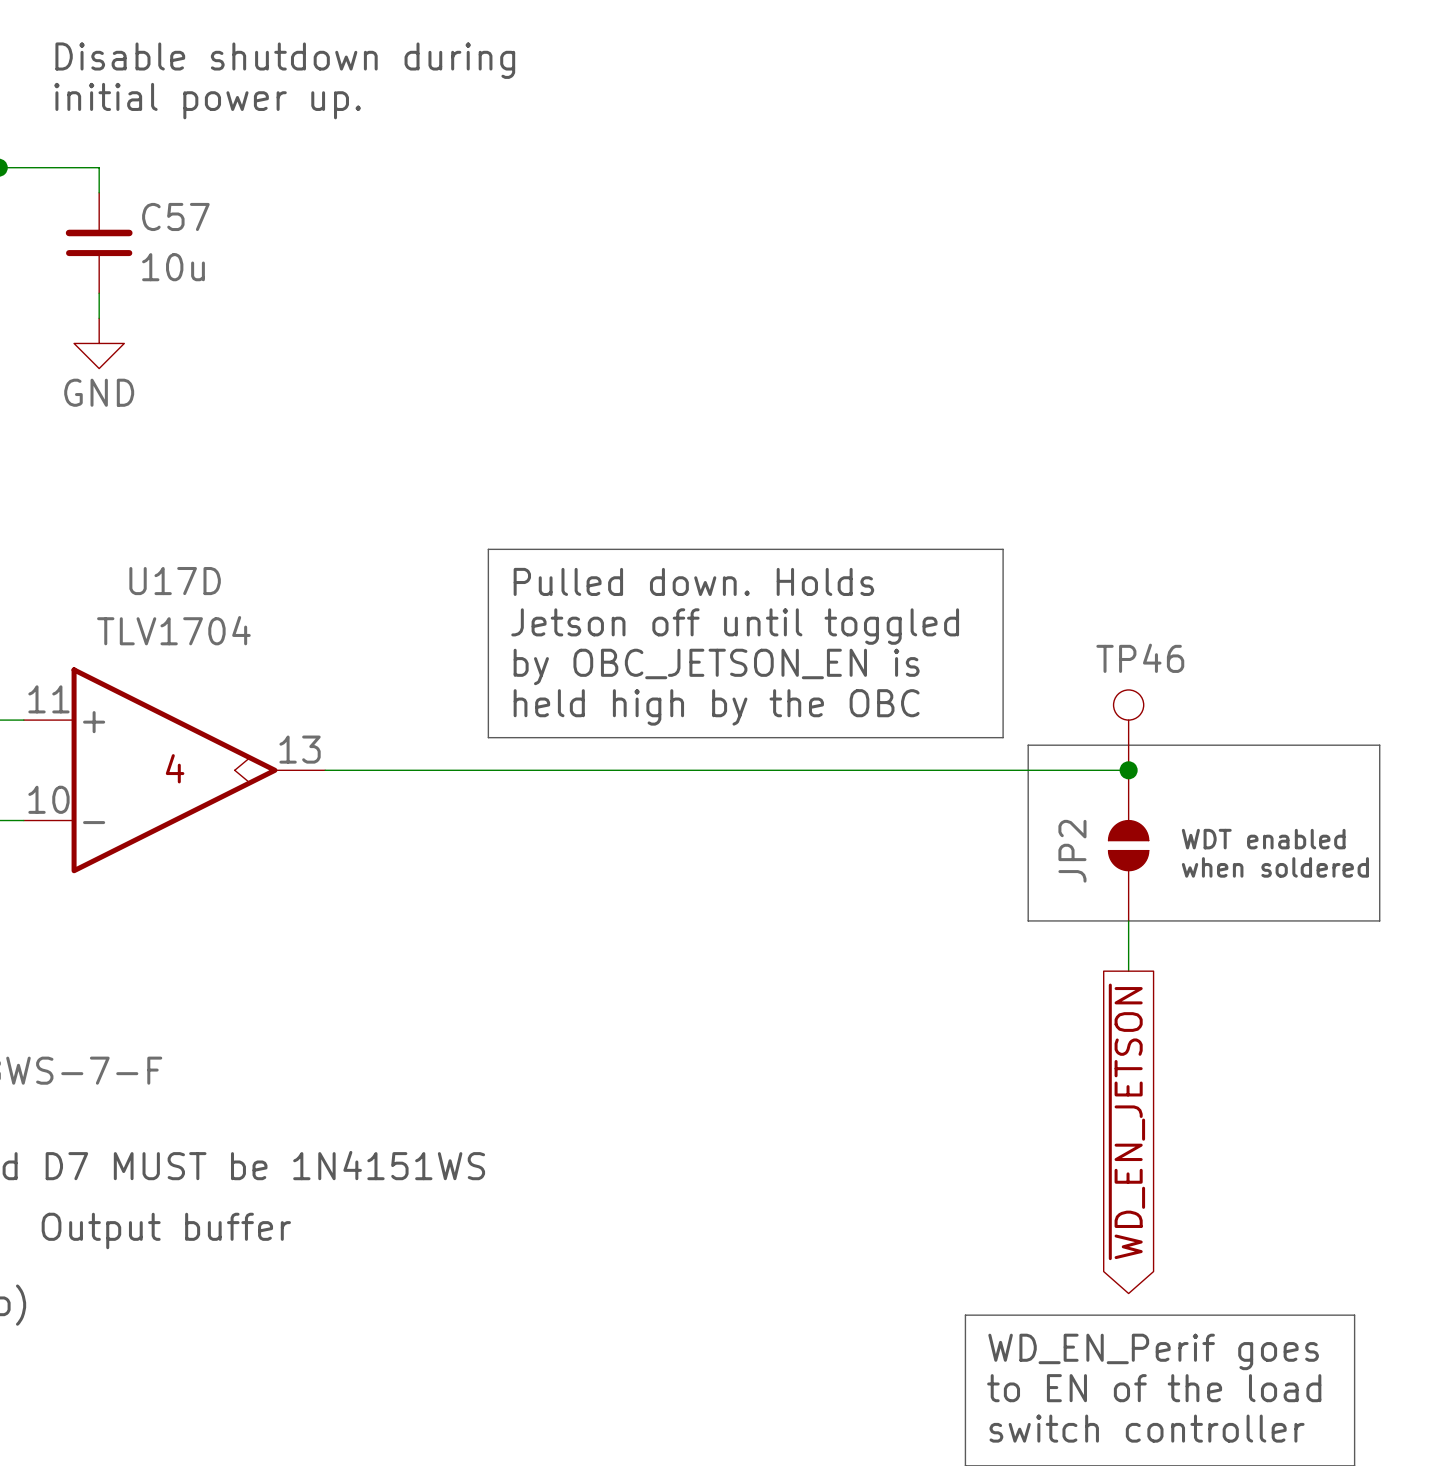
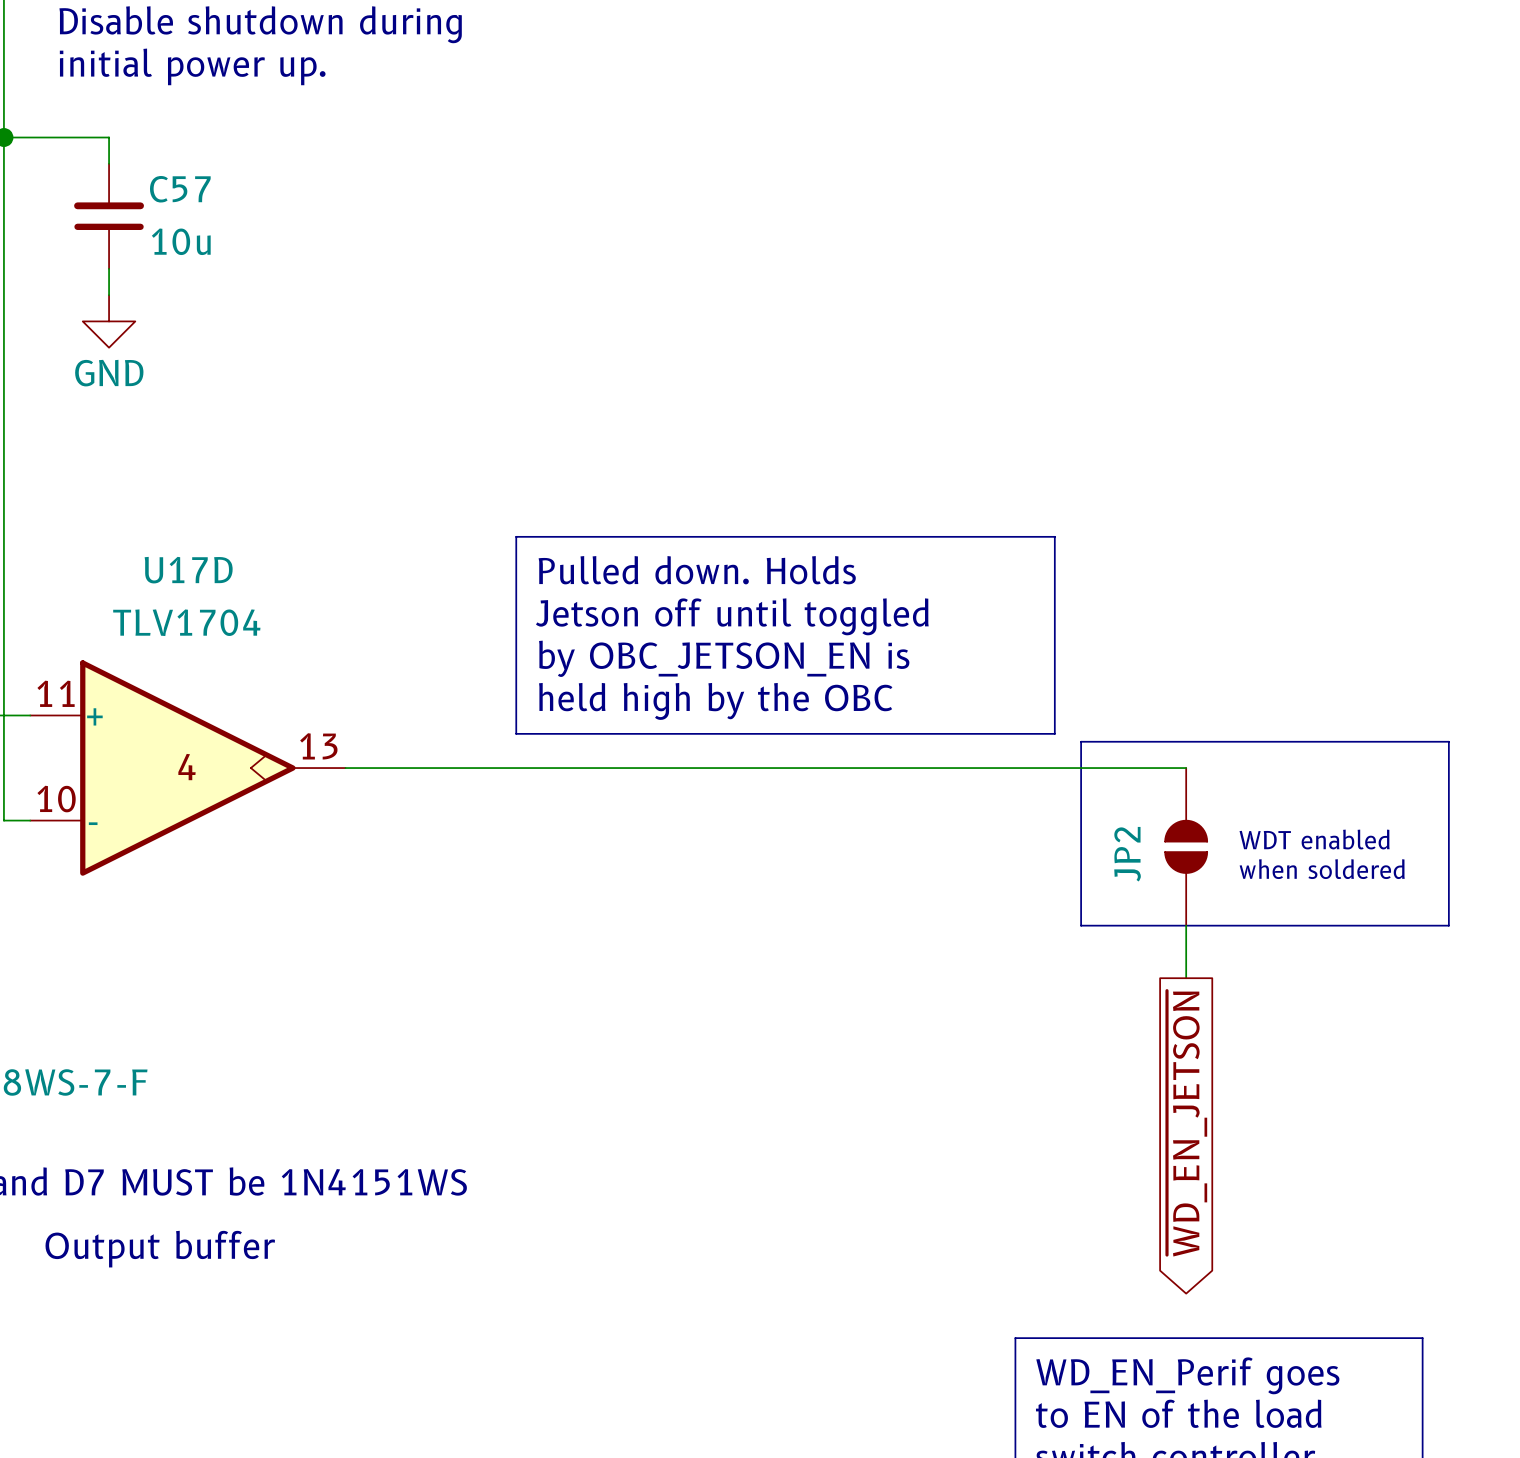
TP46: (1128, 730) -> none
junction: (1128, 770) -> none

